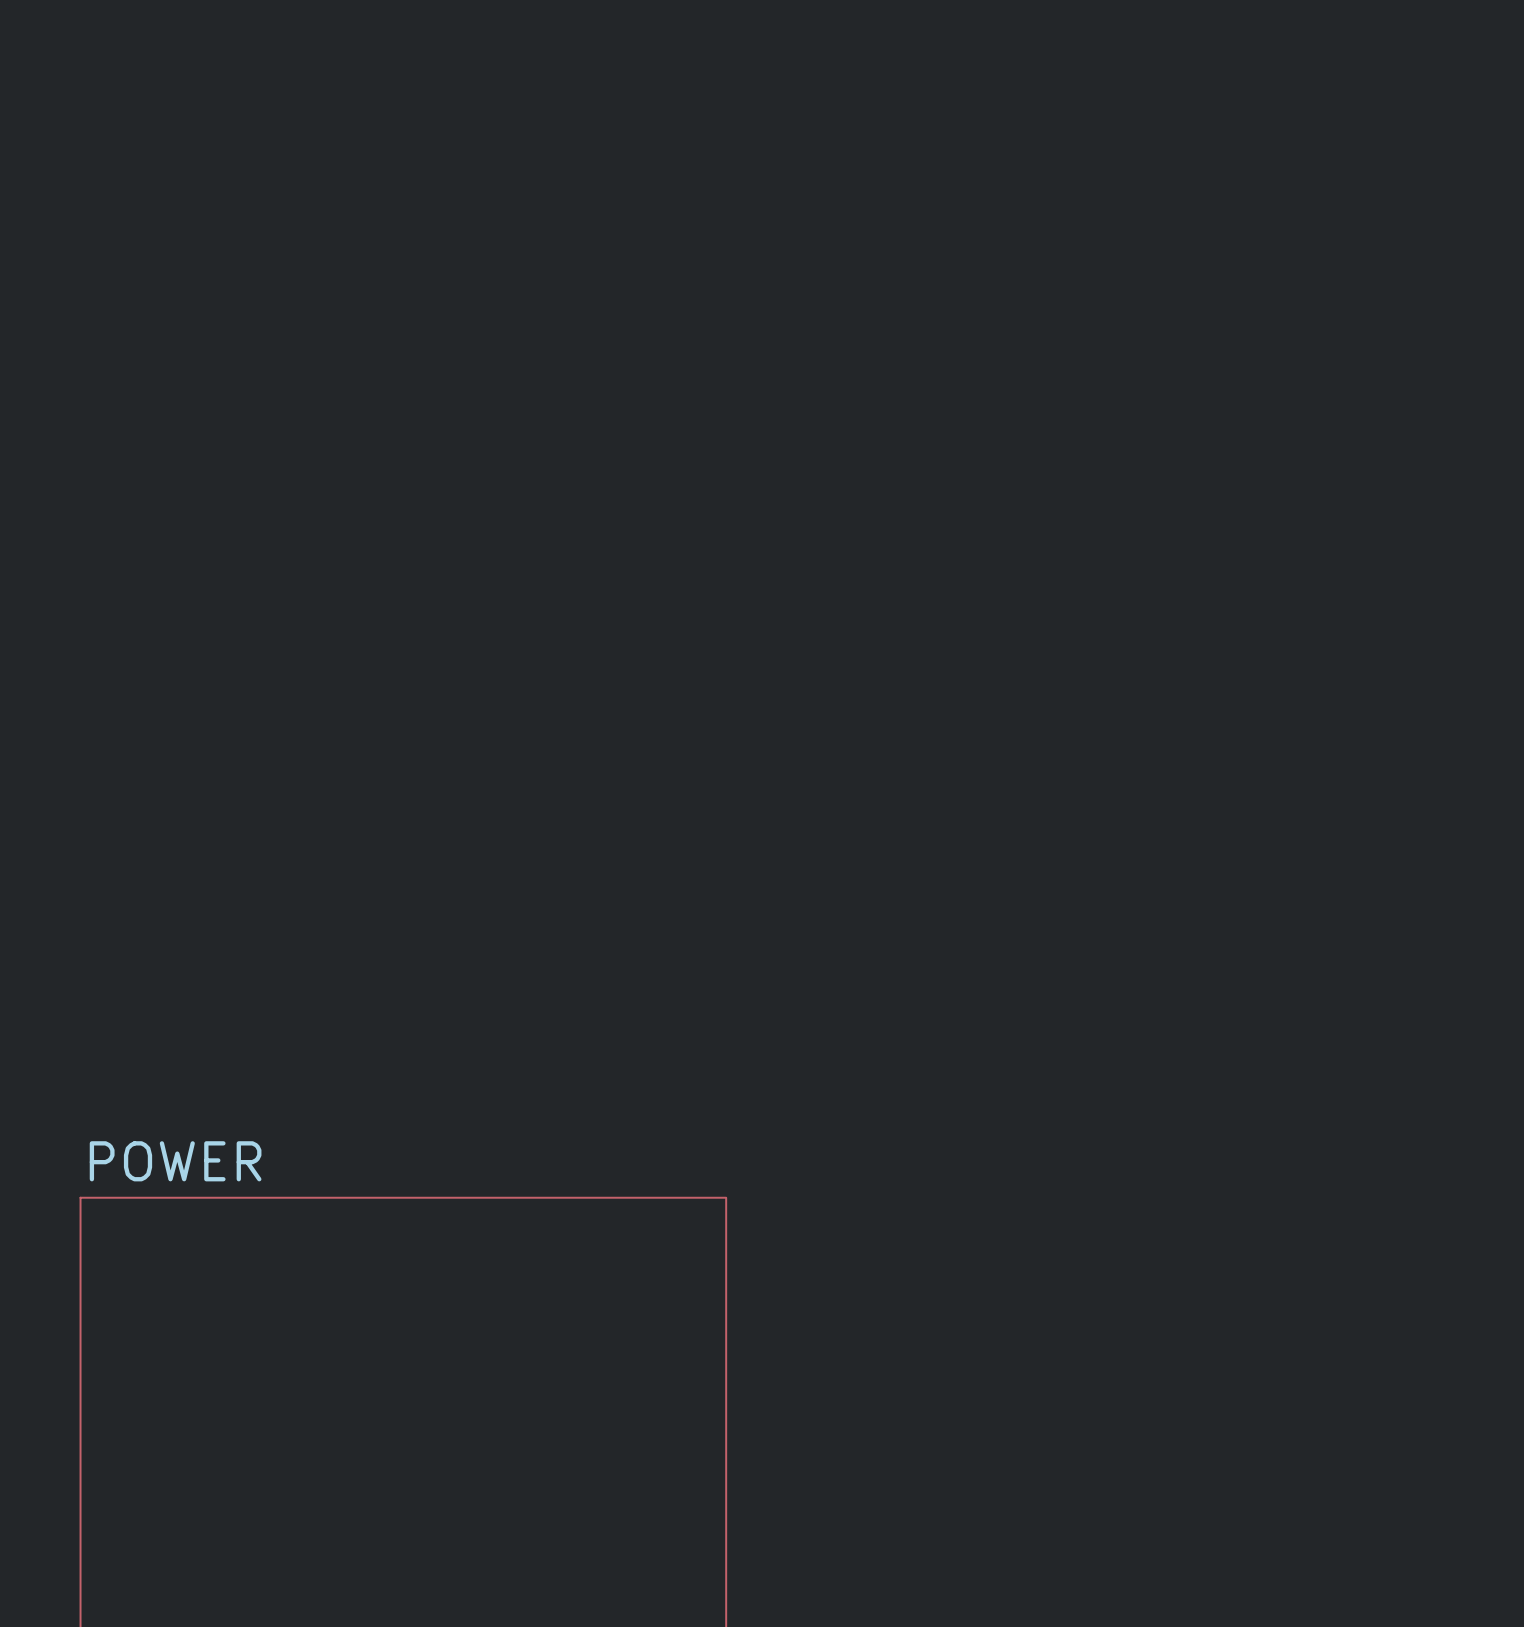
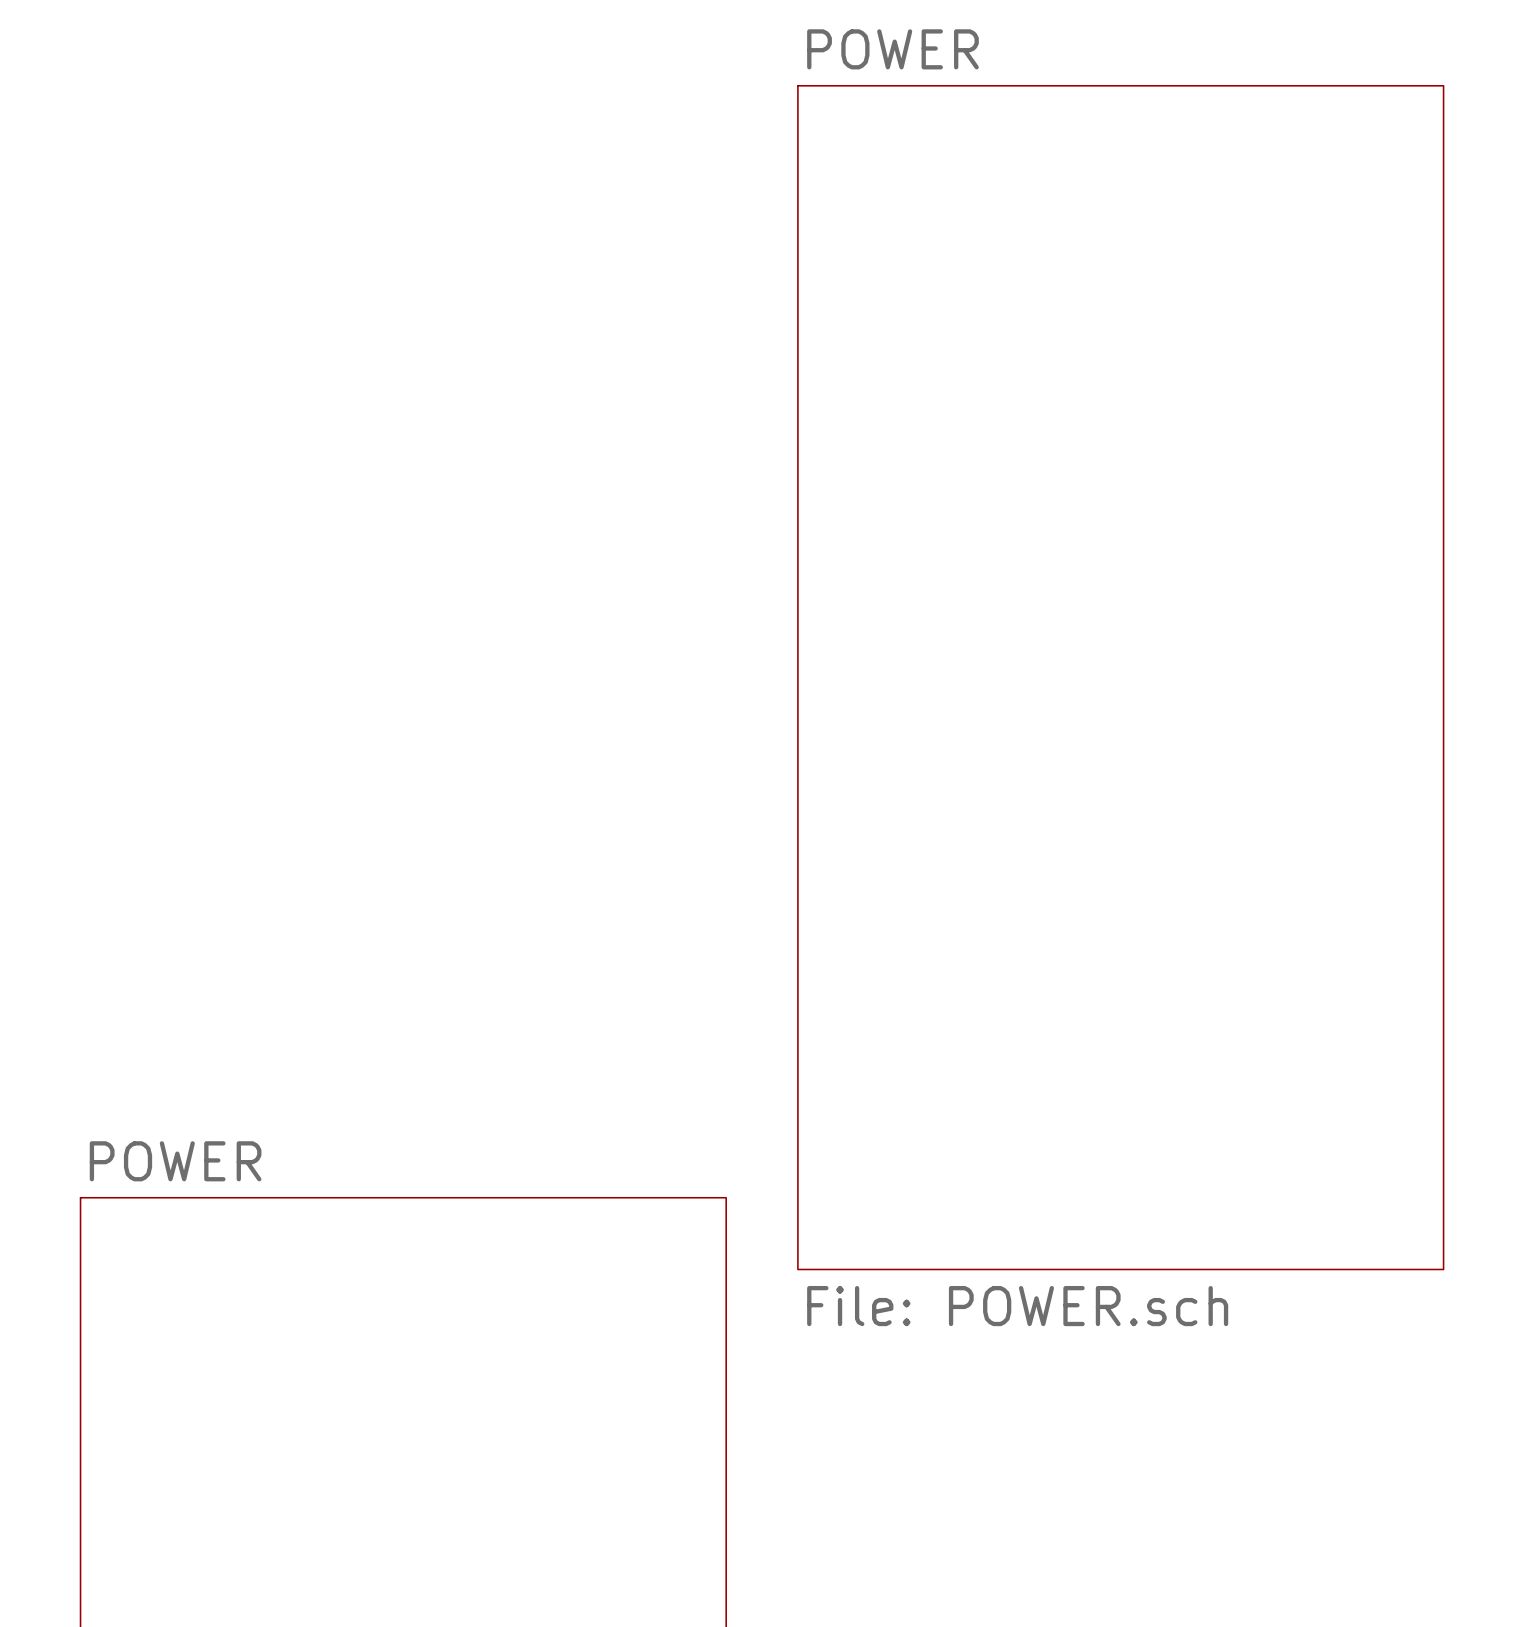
sheet POWER: none -> File: POWER.sch (1120, 677)

